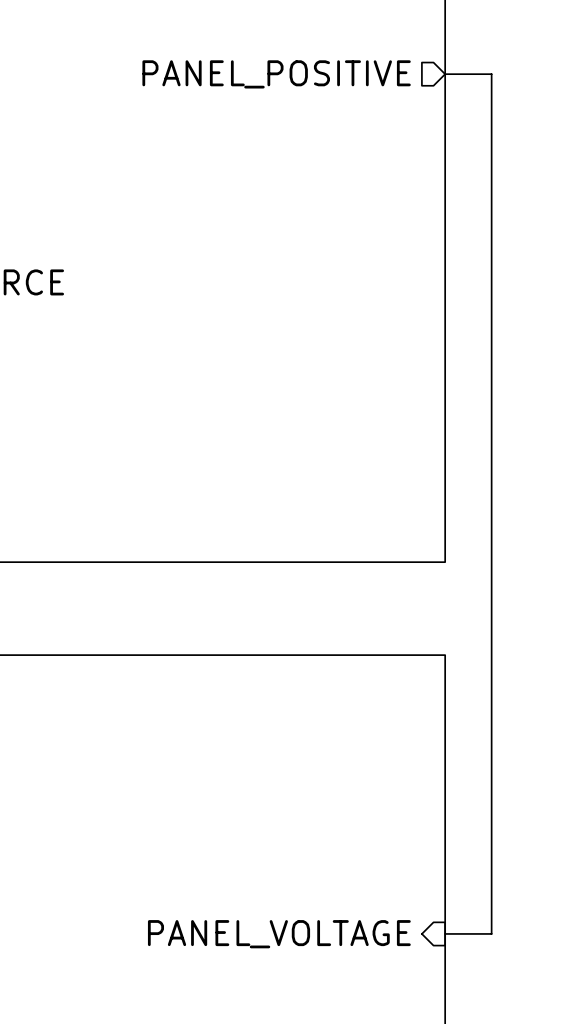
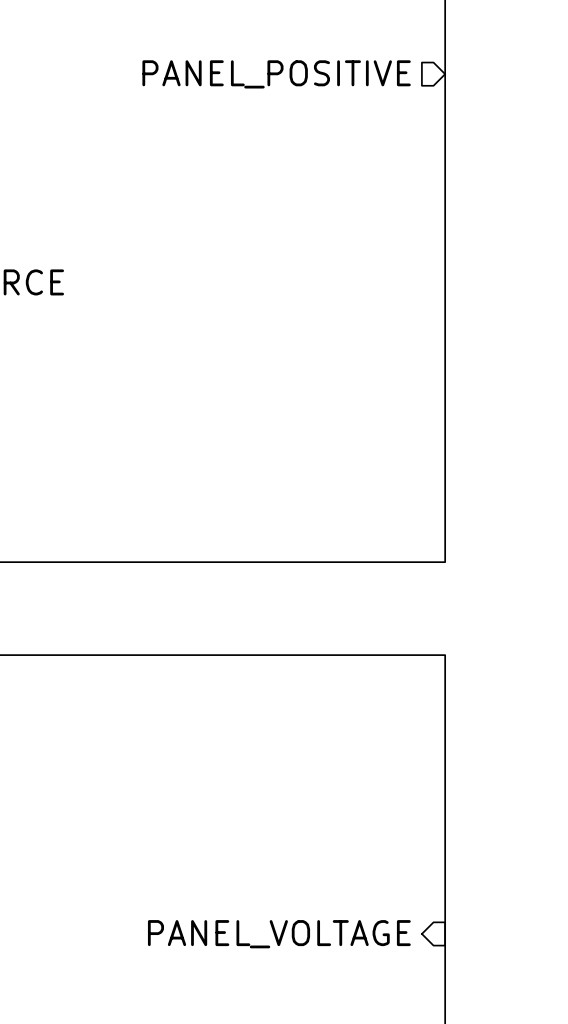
wire: (445, 74) (491, 74) (491, 933) (445, 933) -> none

